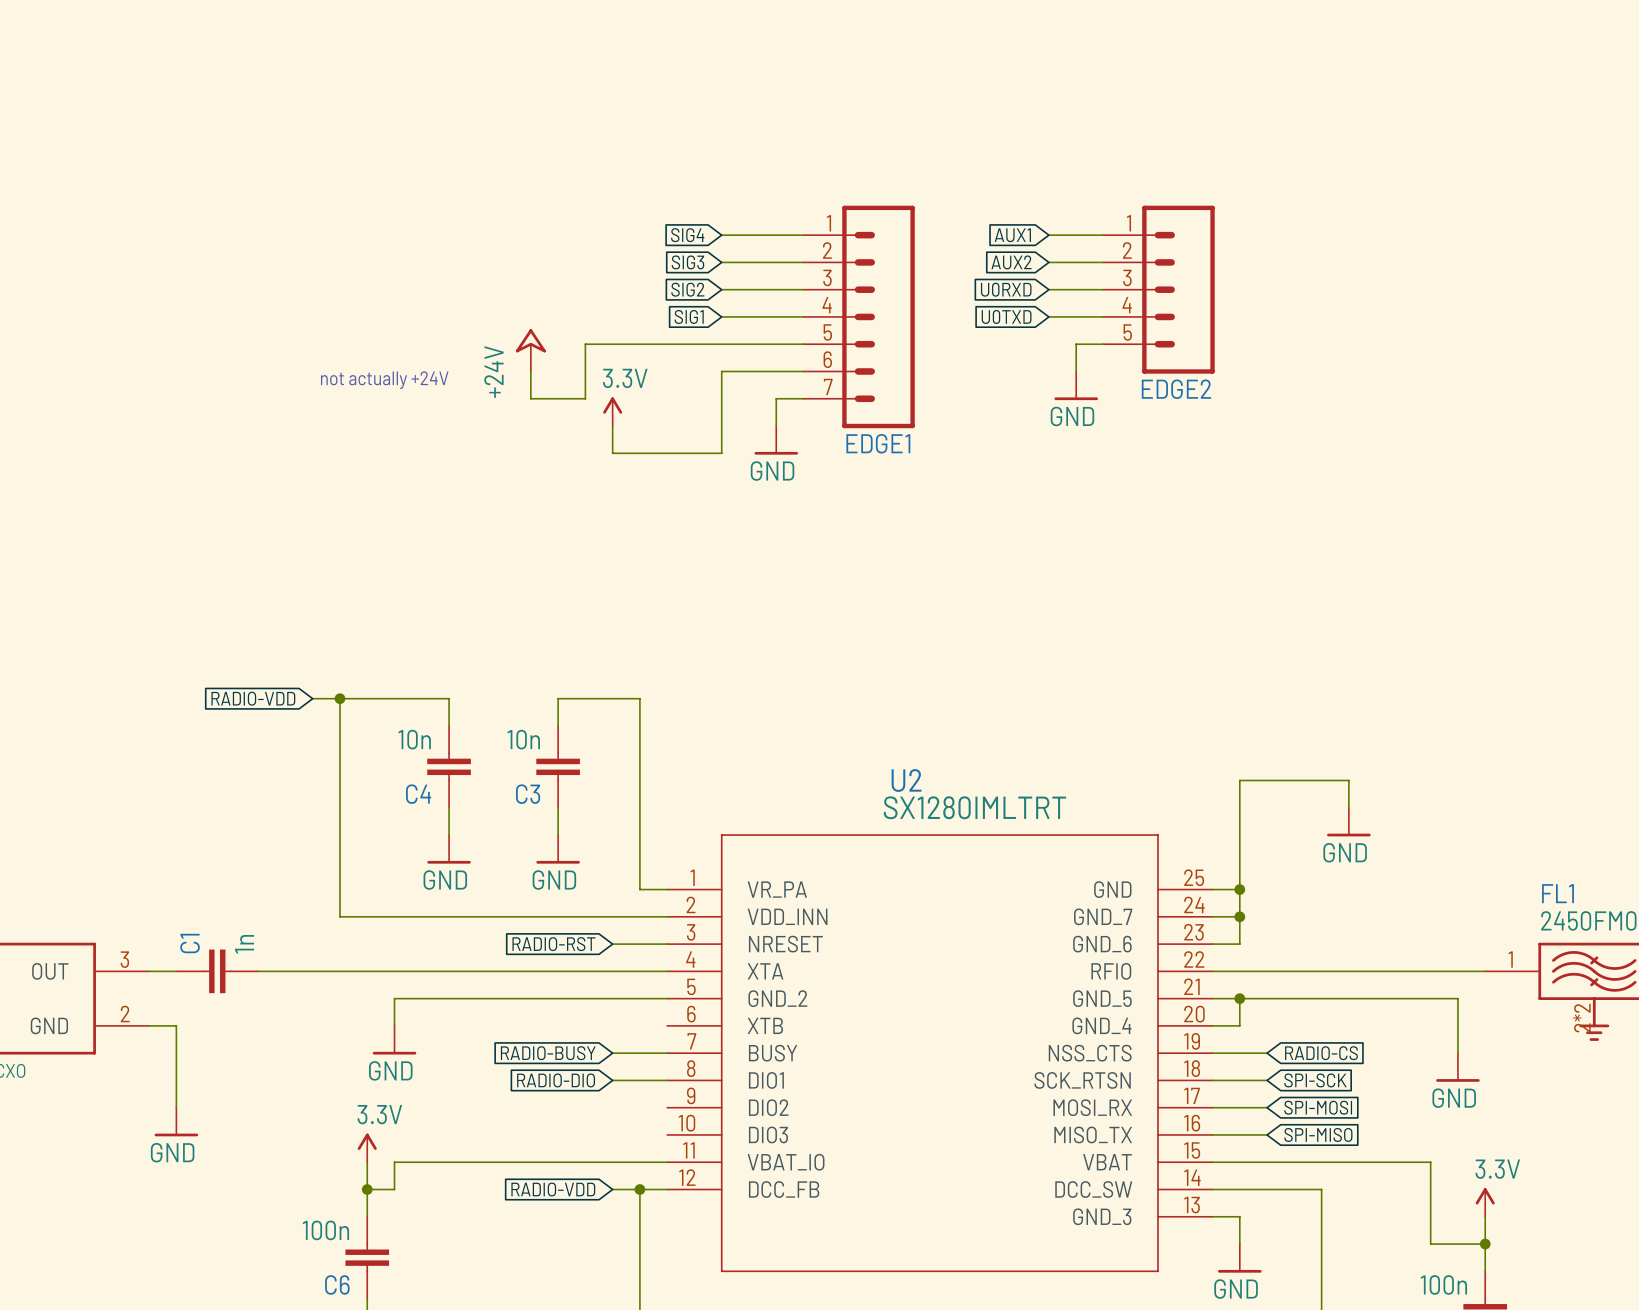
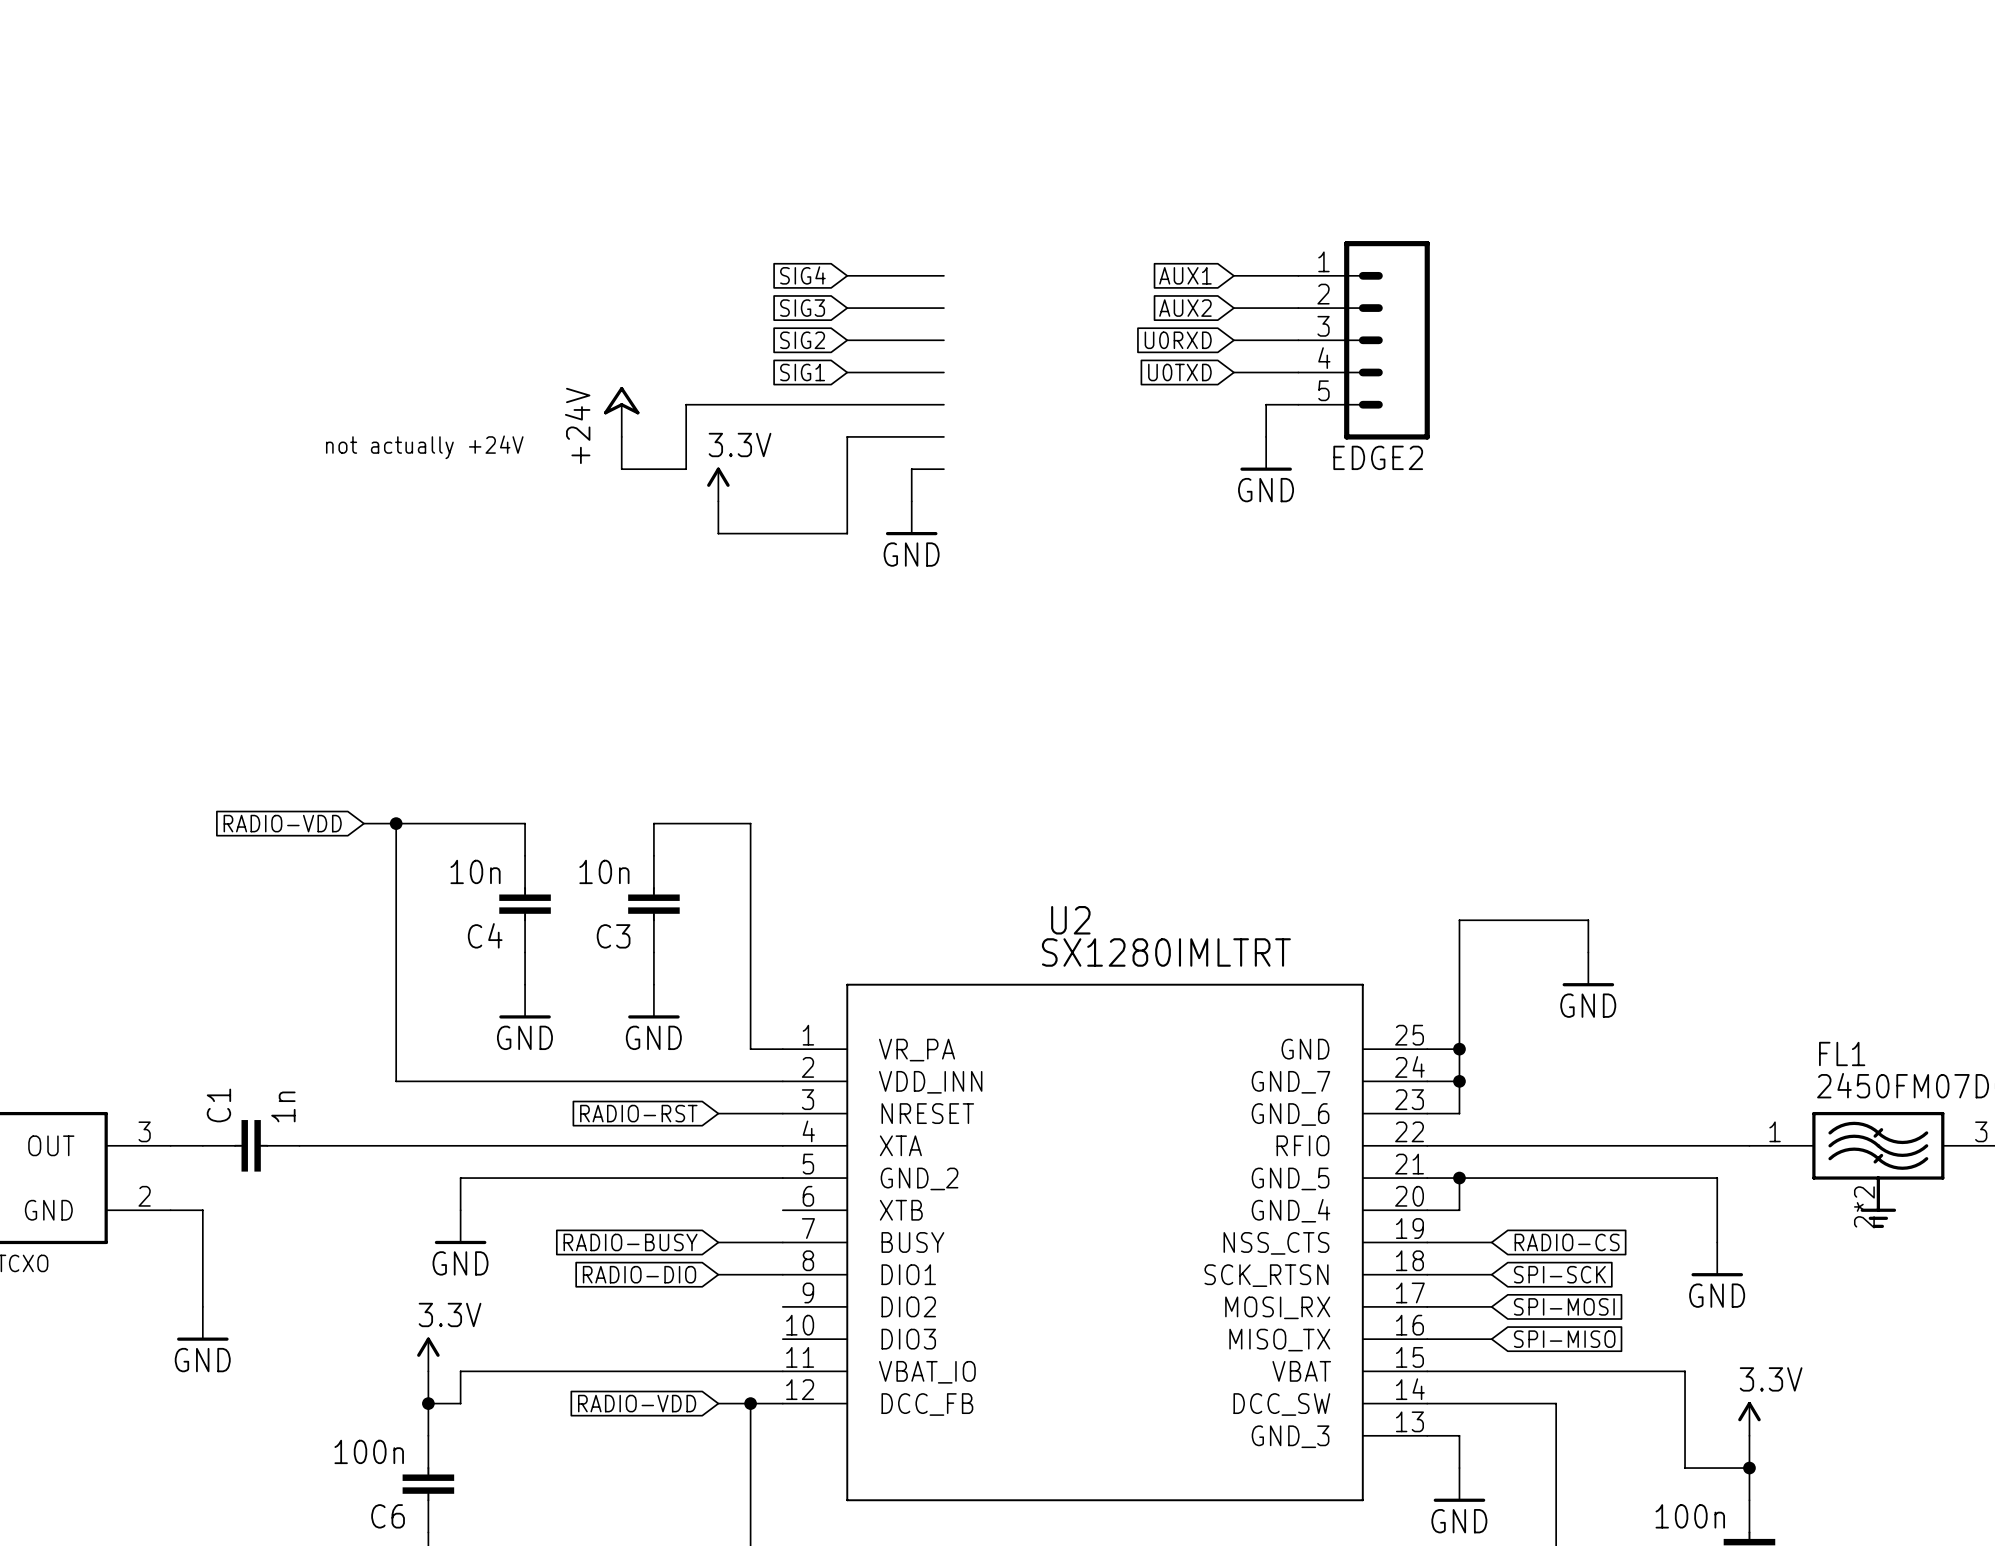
EDGE1: (859, 316) -> none

